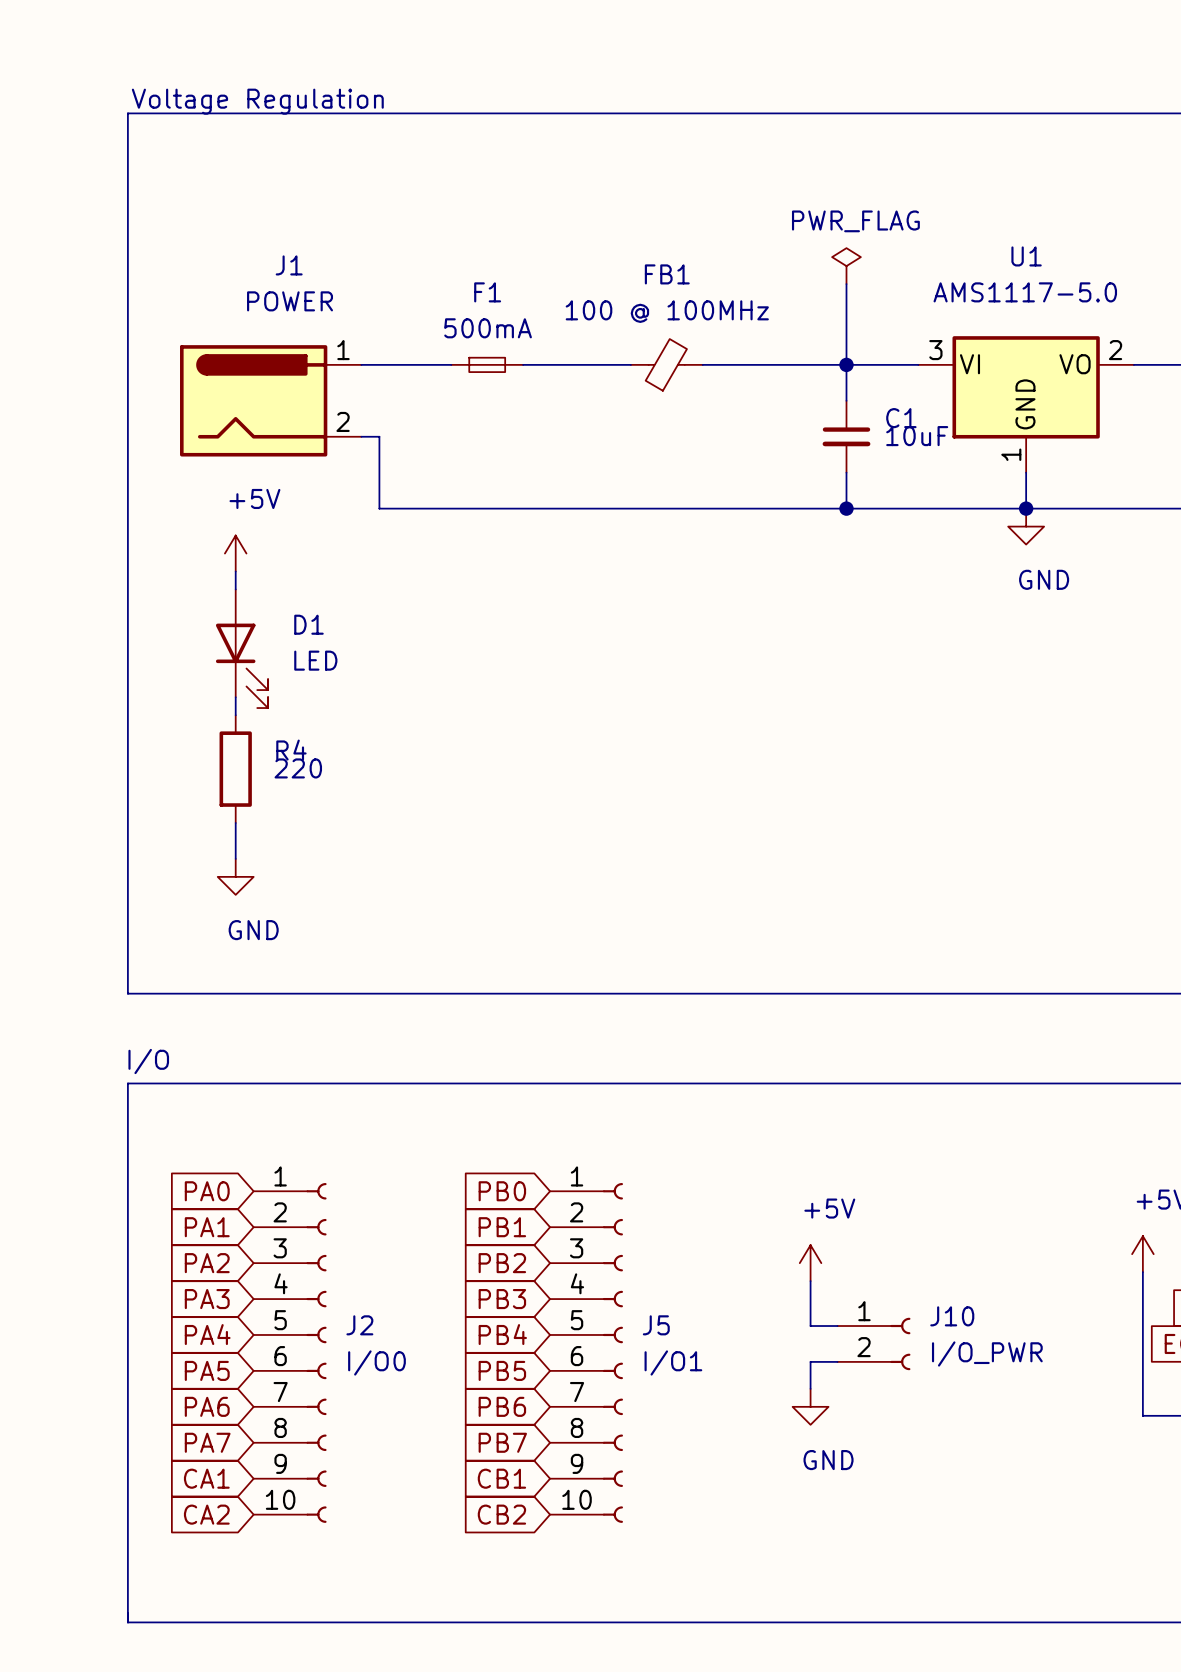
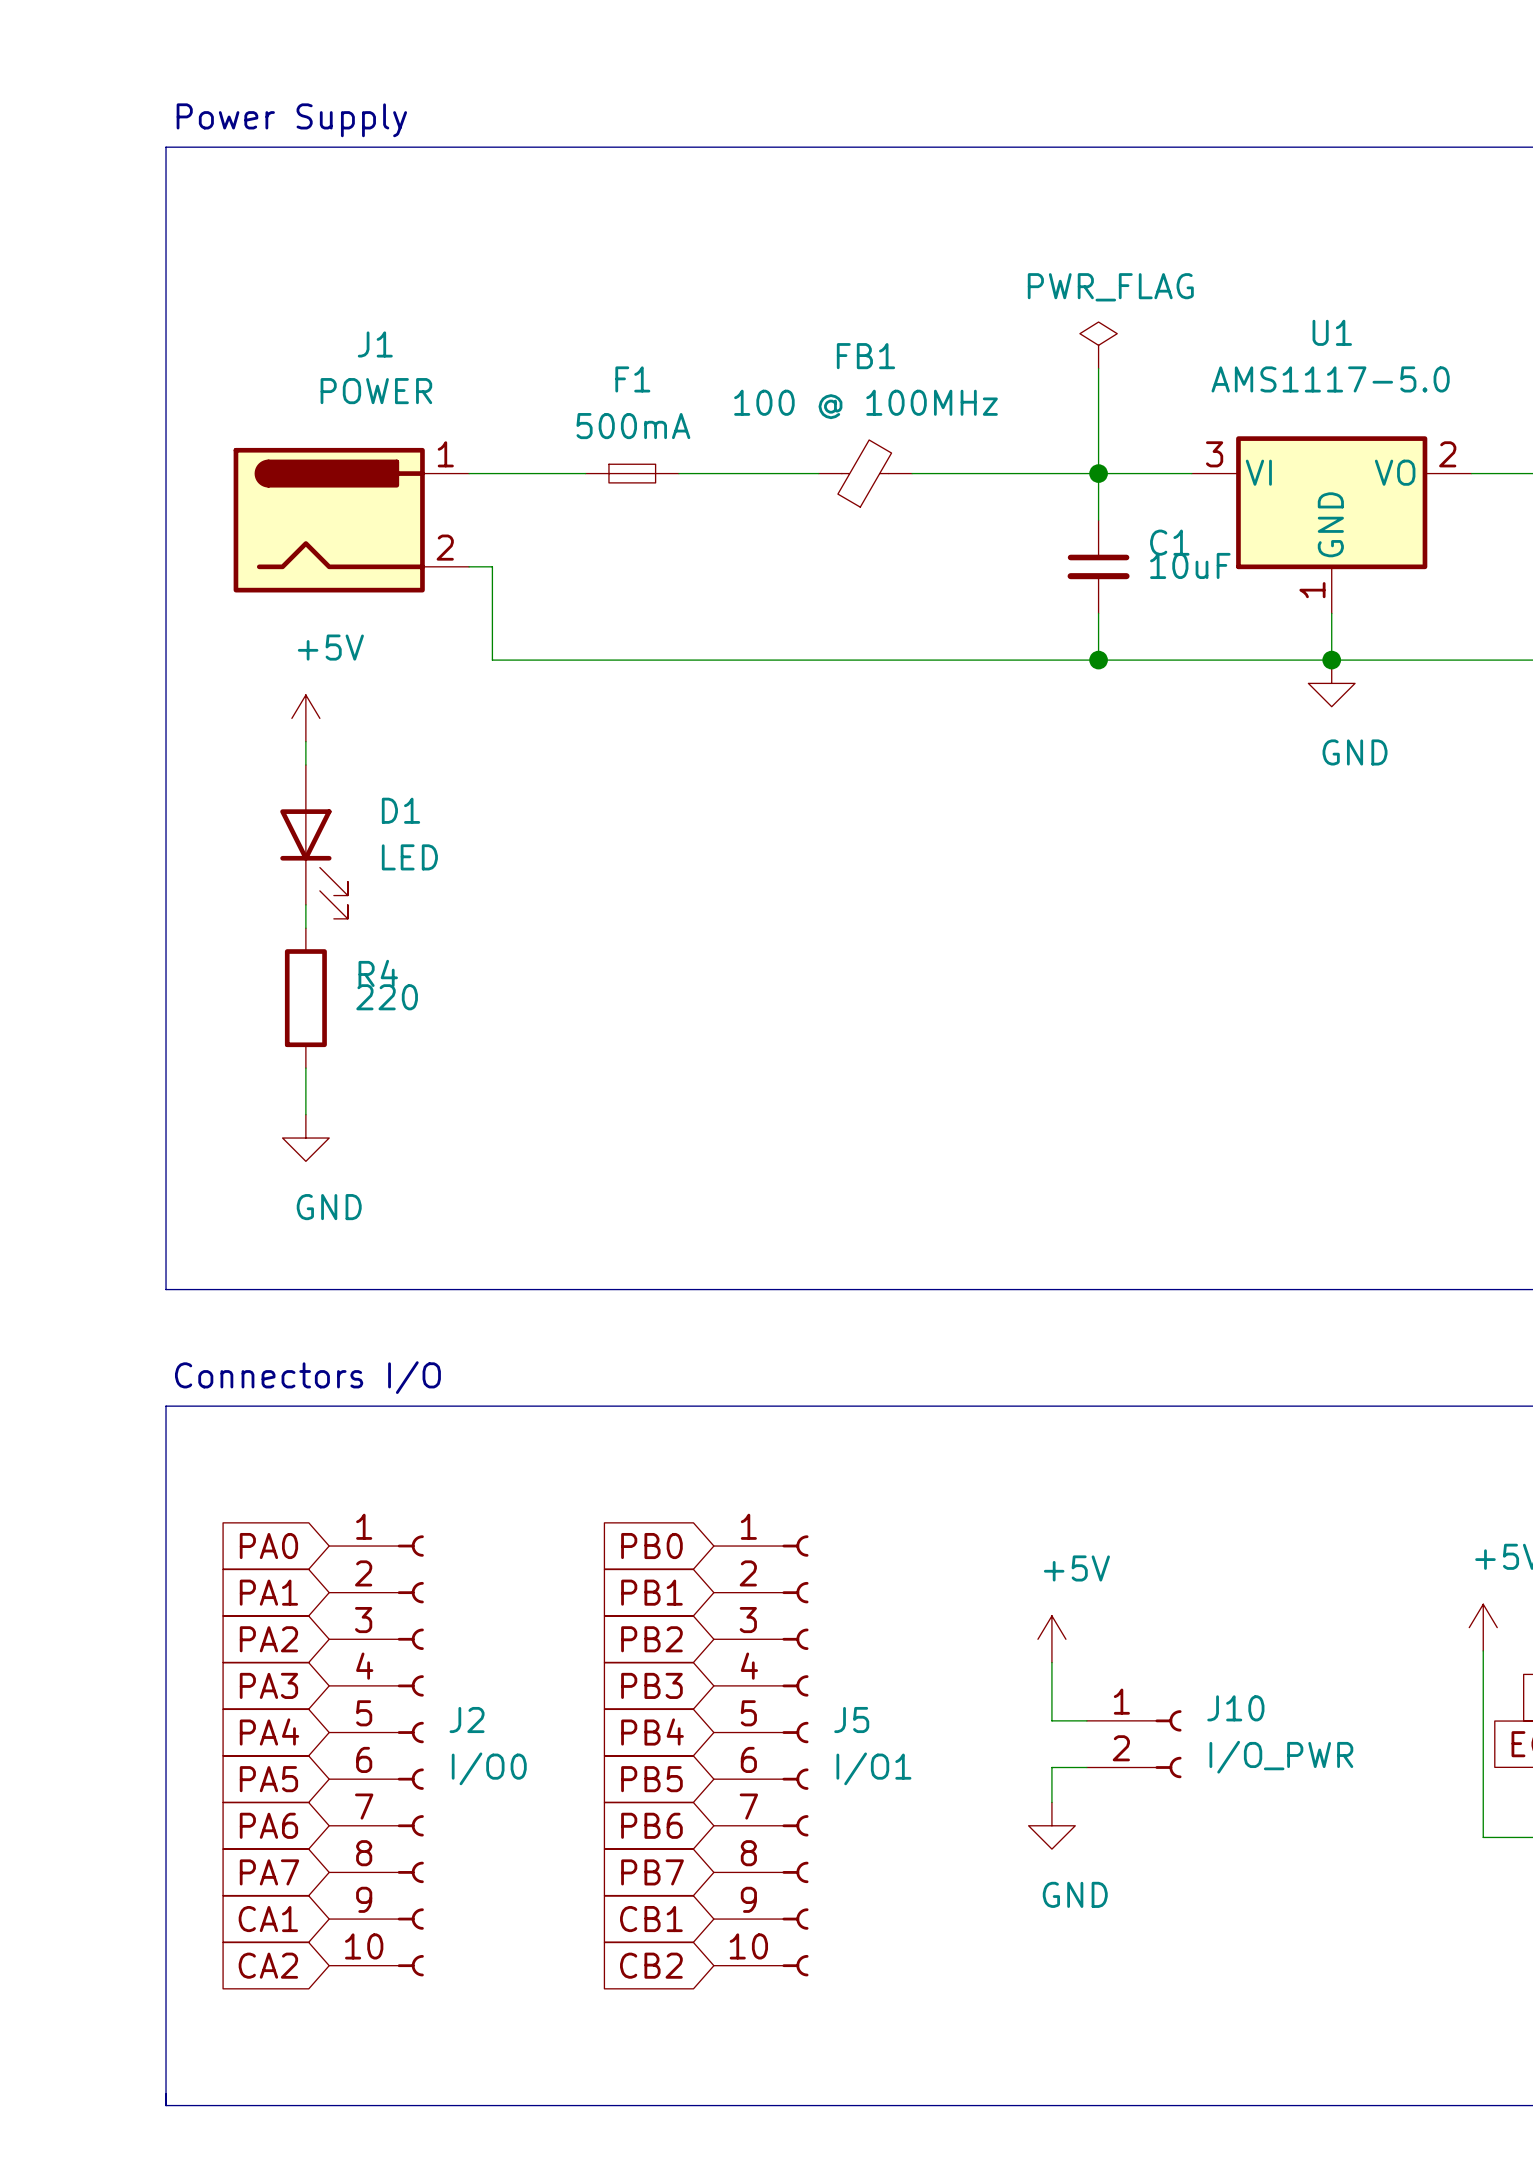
text: none -> Power Supply (291, 120)
text: Voltage Regulation (257, 101) -> none
text: I/O (148, 1061) -> none
text: none -> Connectors I/O (307, 1377)

